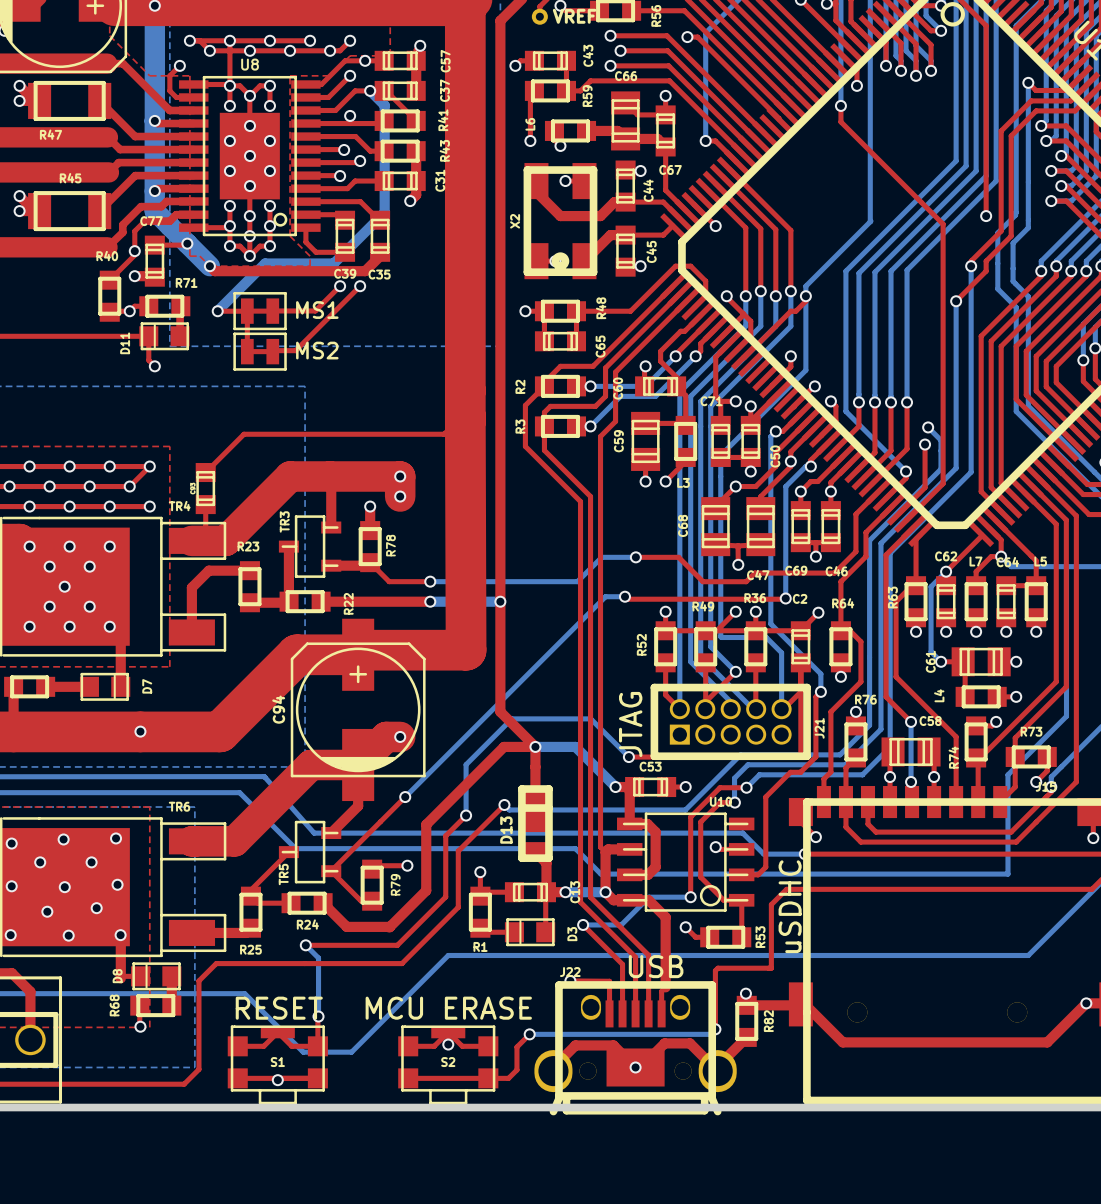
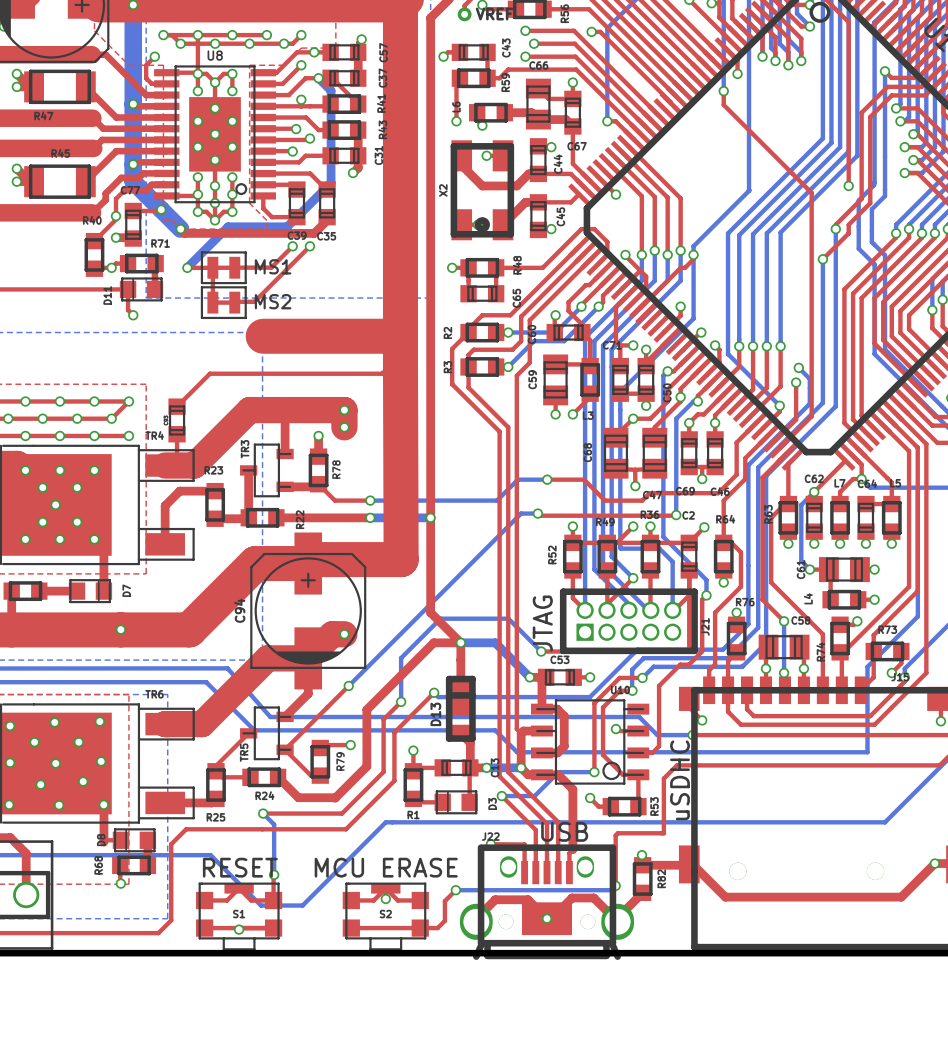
top track: none -> (263, 336) (400, 336)

